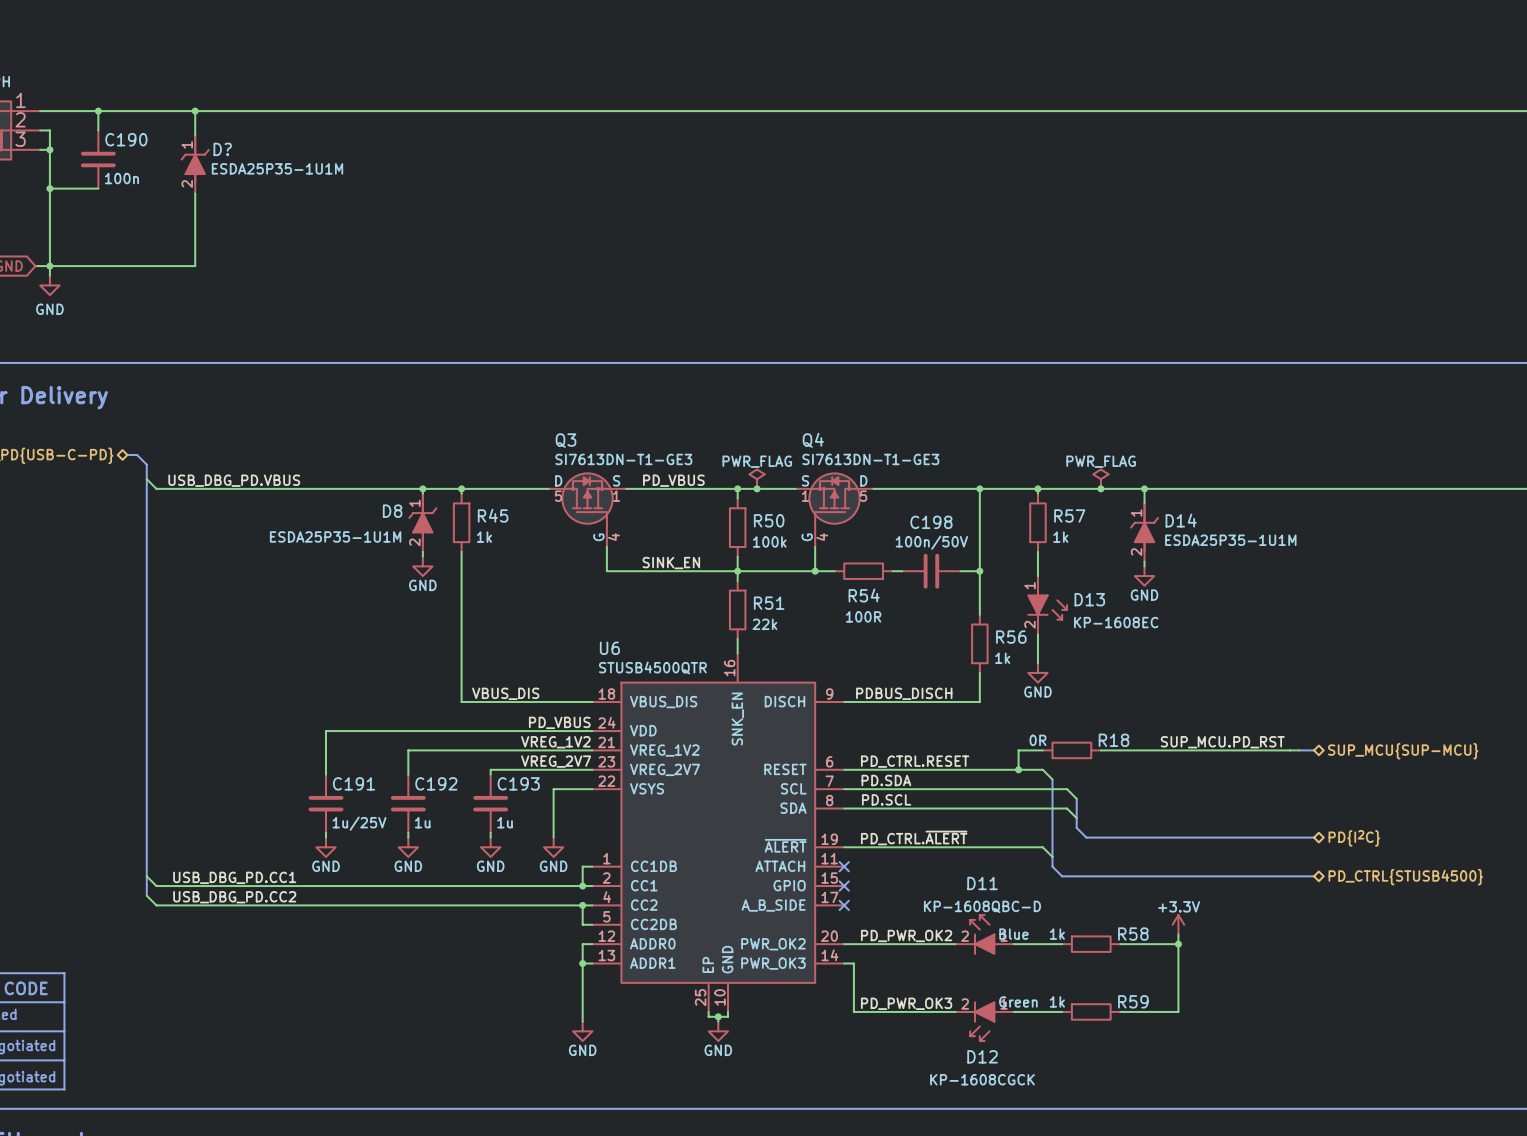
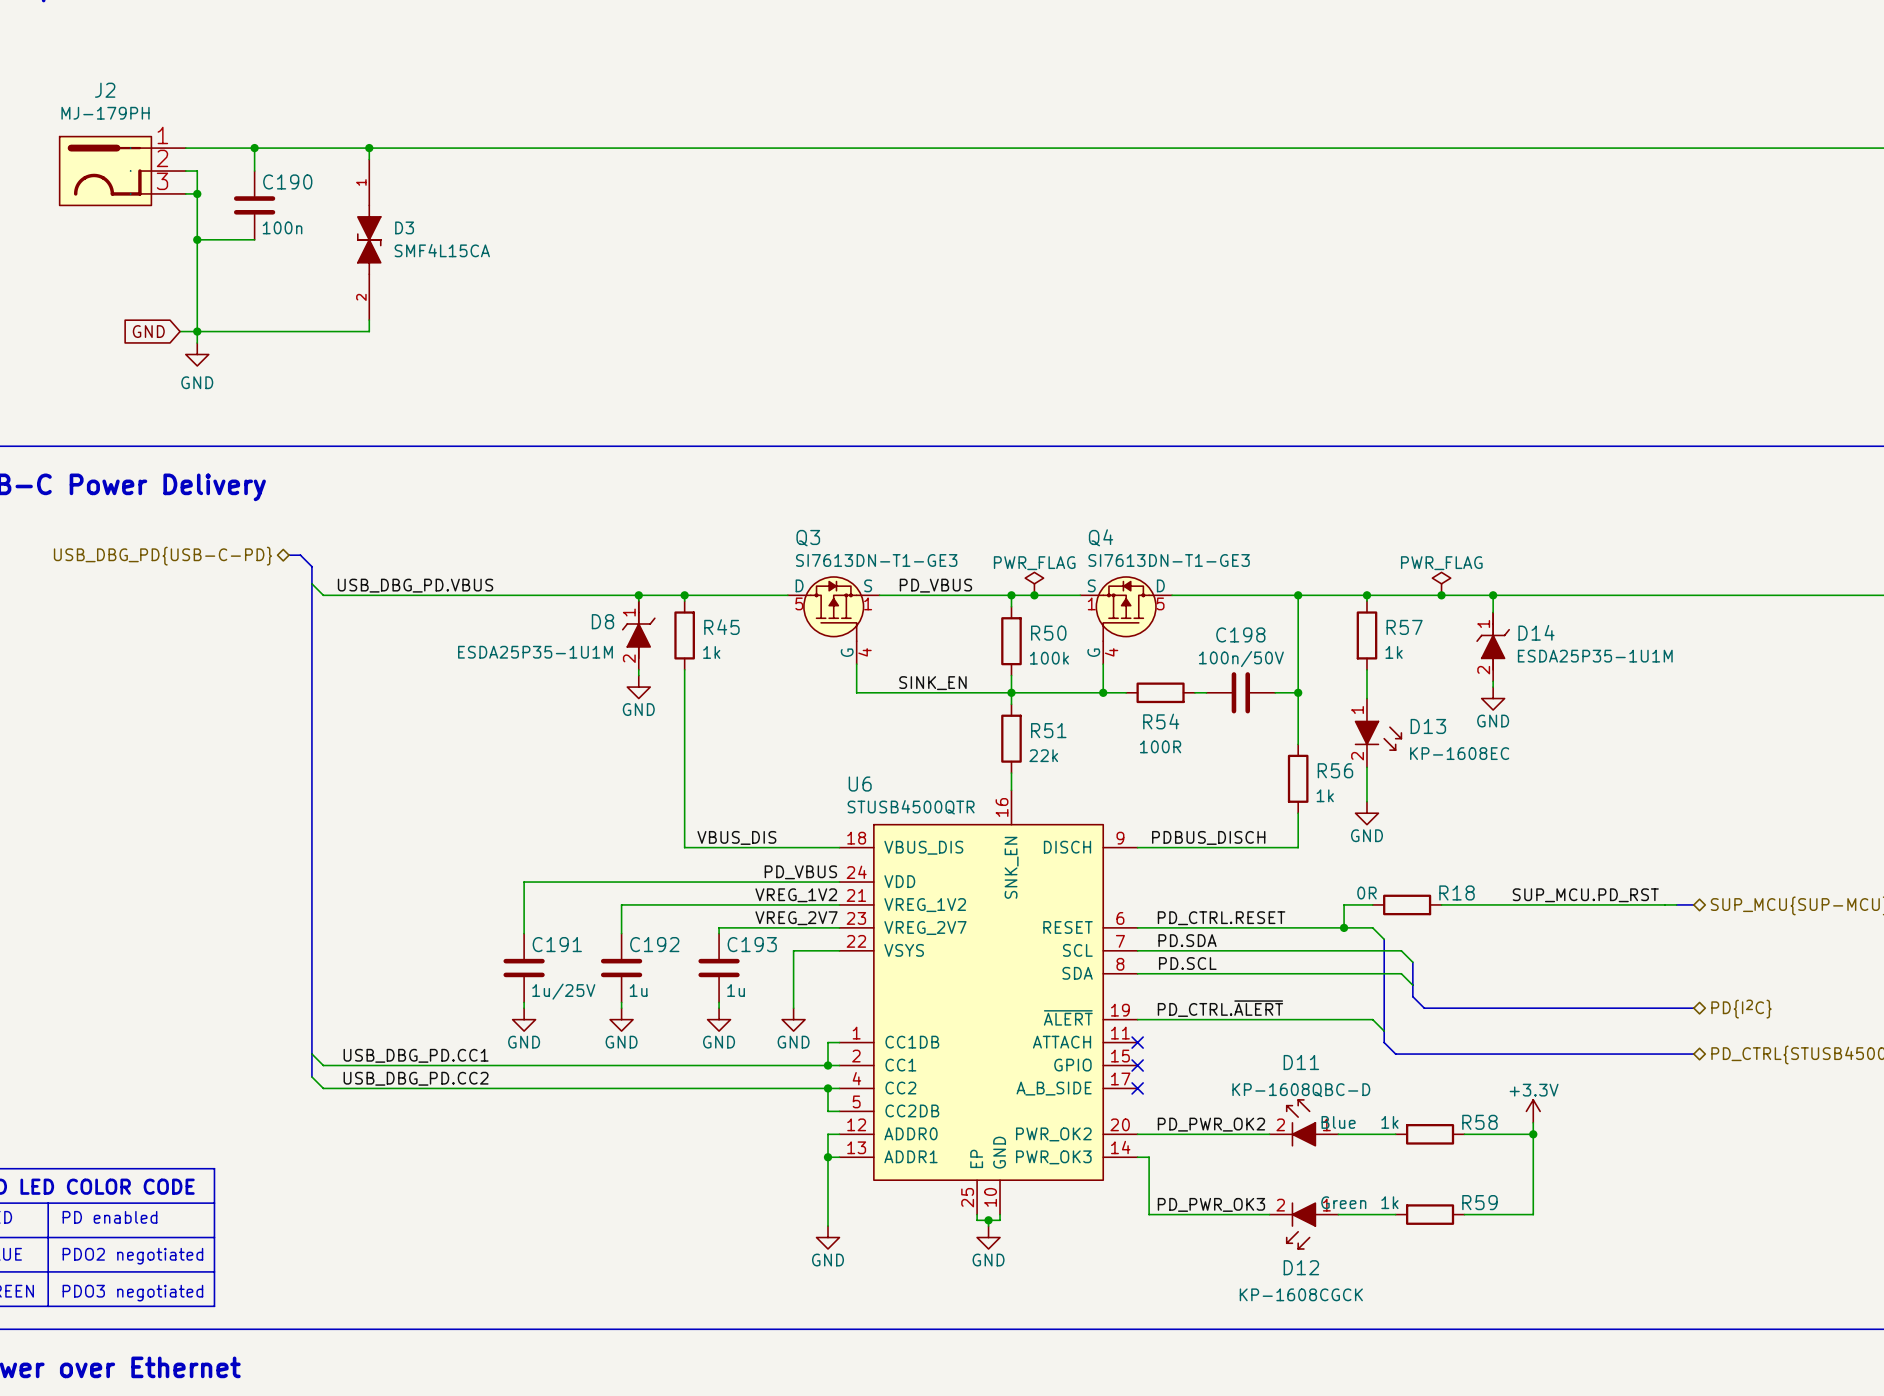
D?: ESDA25P35-1U1M (195, 164) -> none
D3: none -> SMF4L15CA (369, 239)

